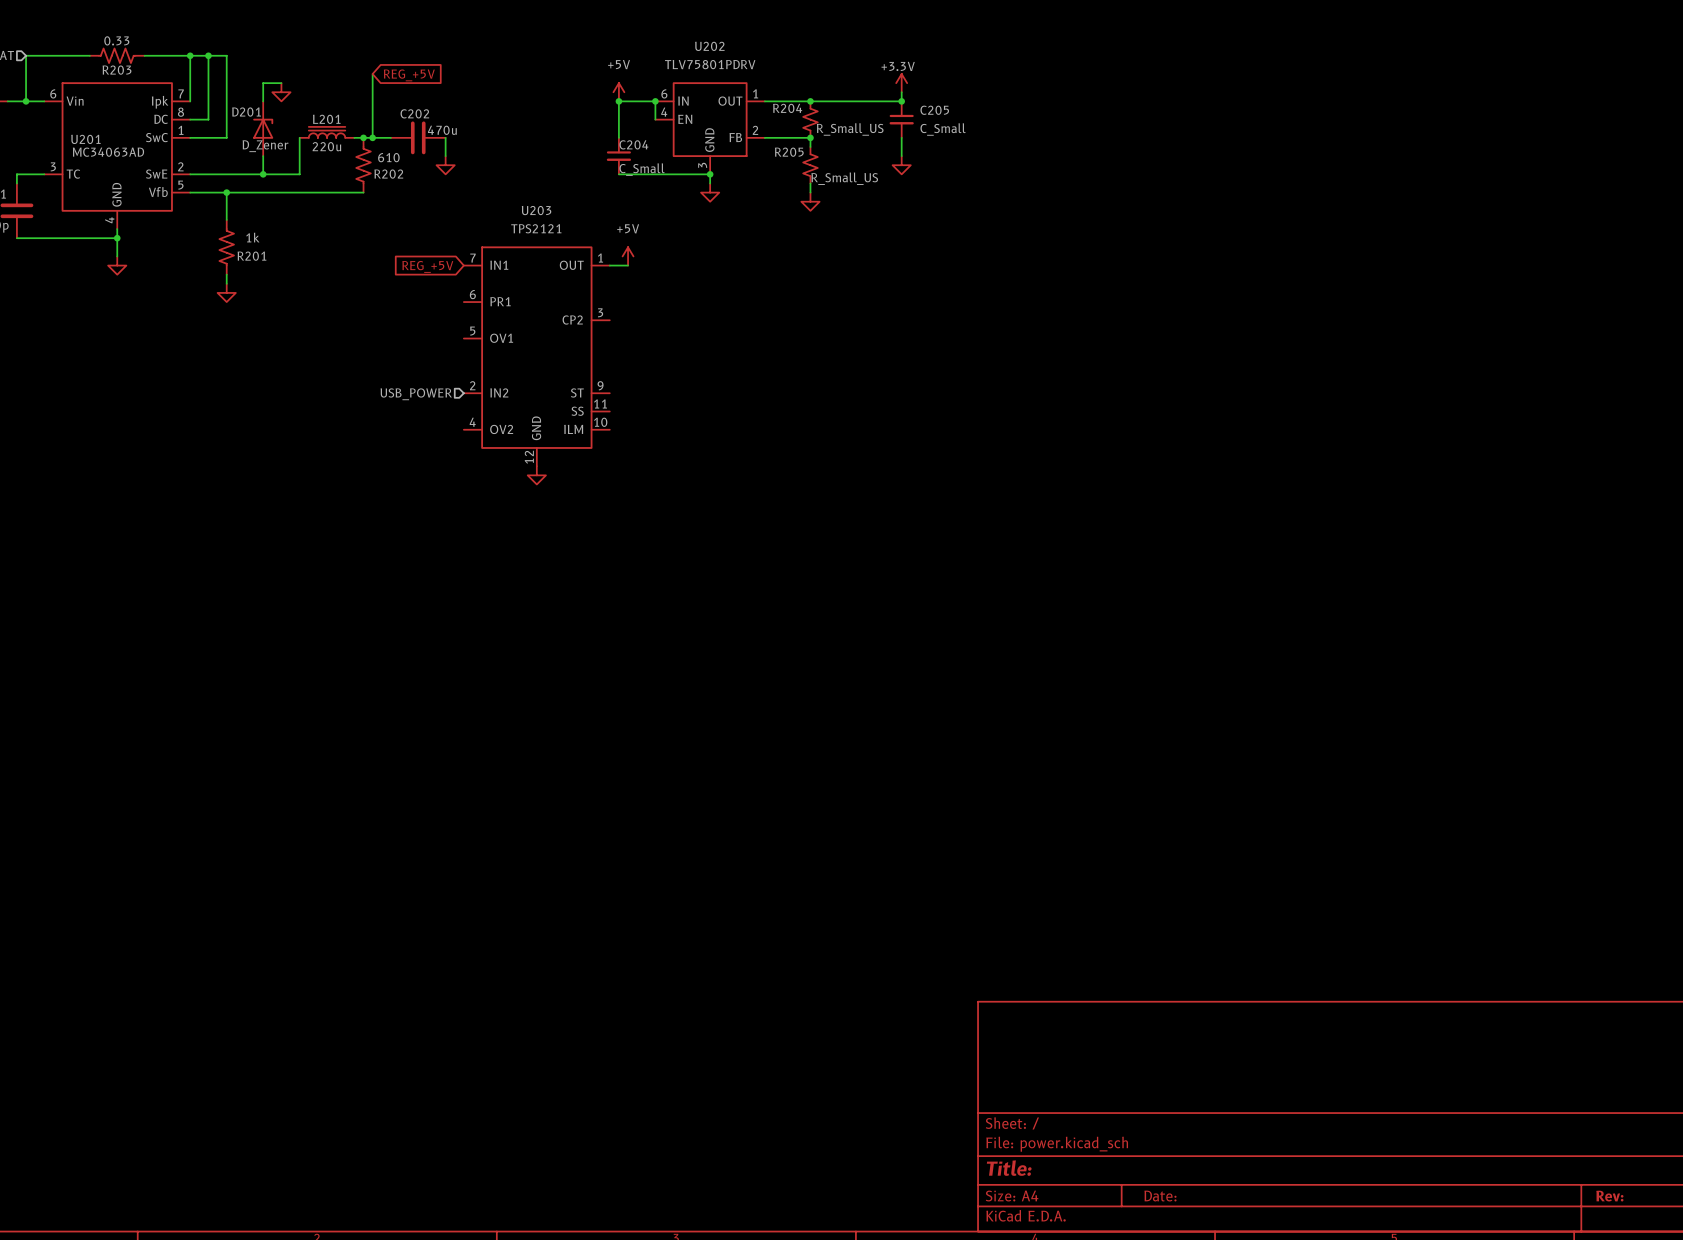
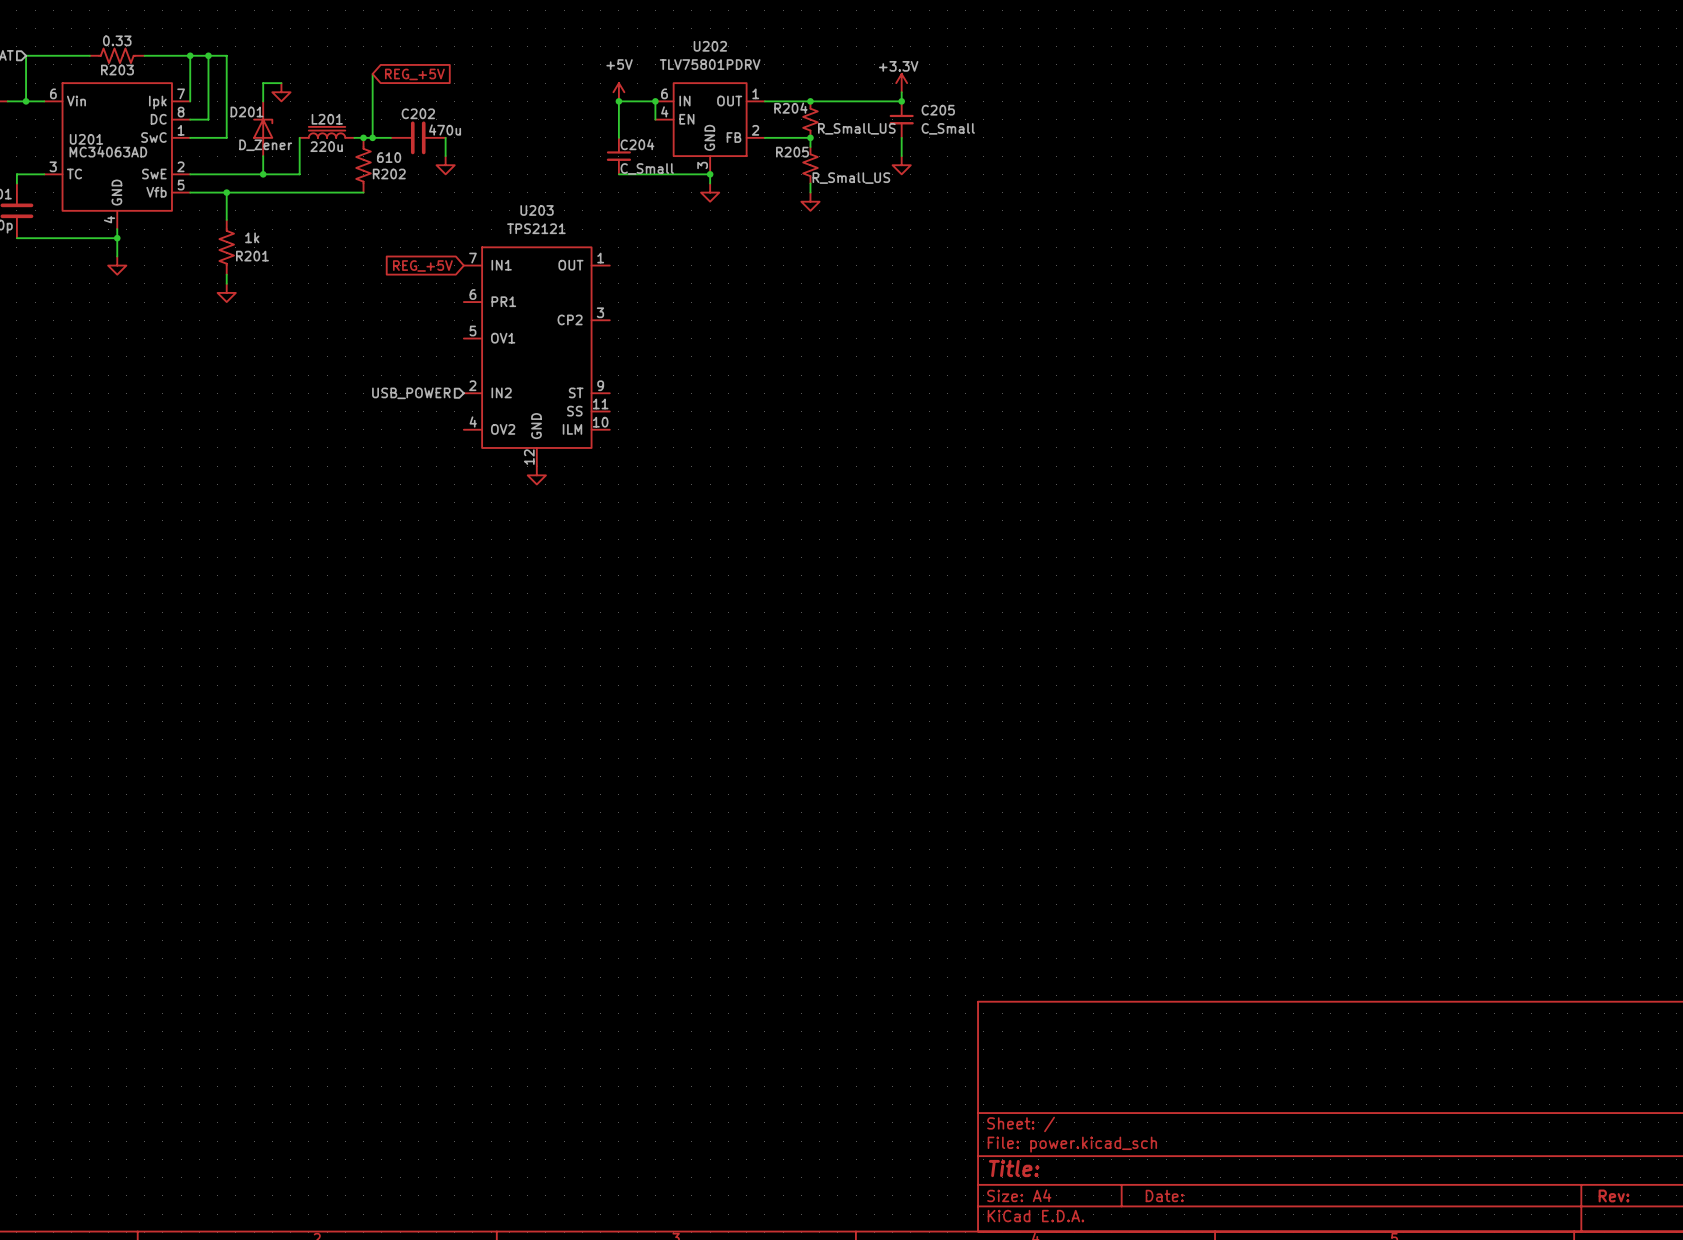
power symbol: +5V (628, 256) -> none
wire: (609, 265) (628, 265) -> none

